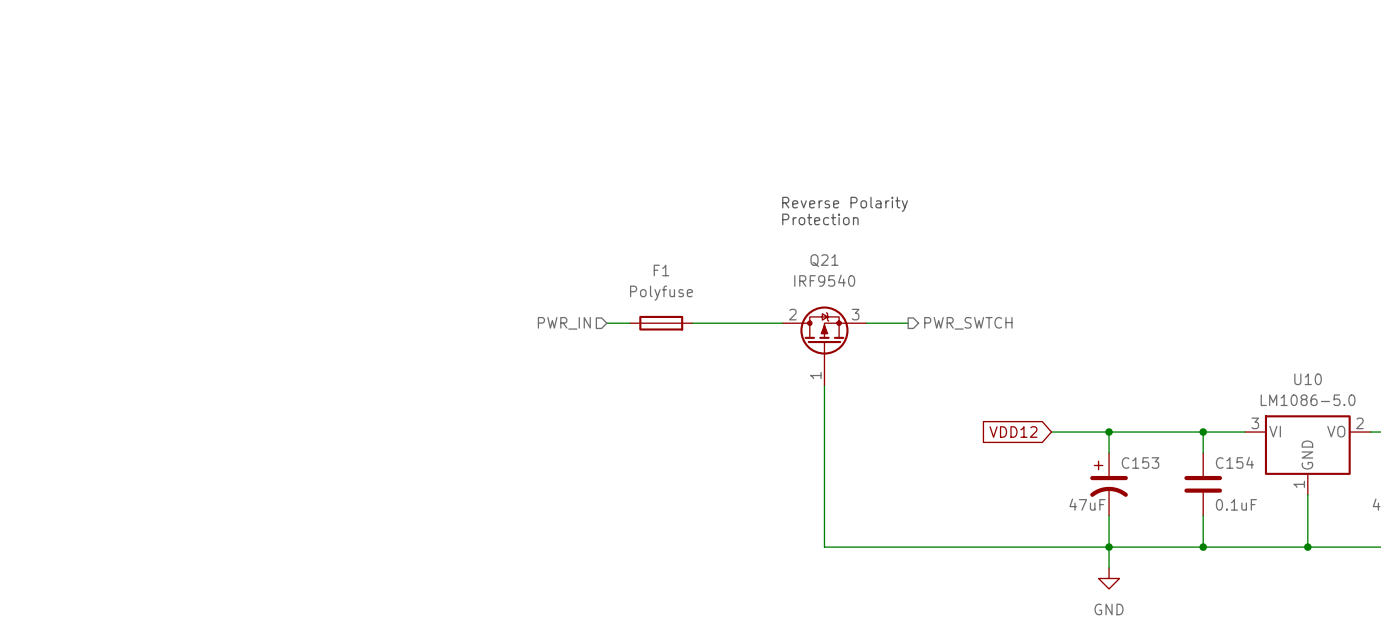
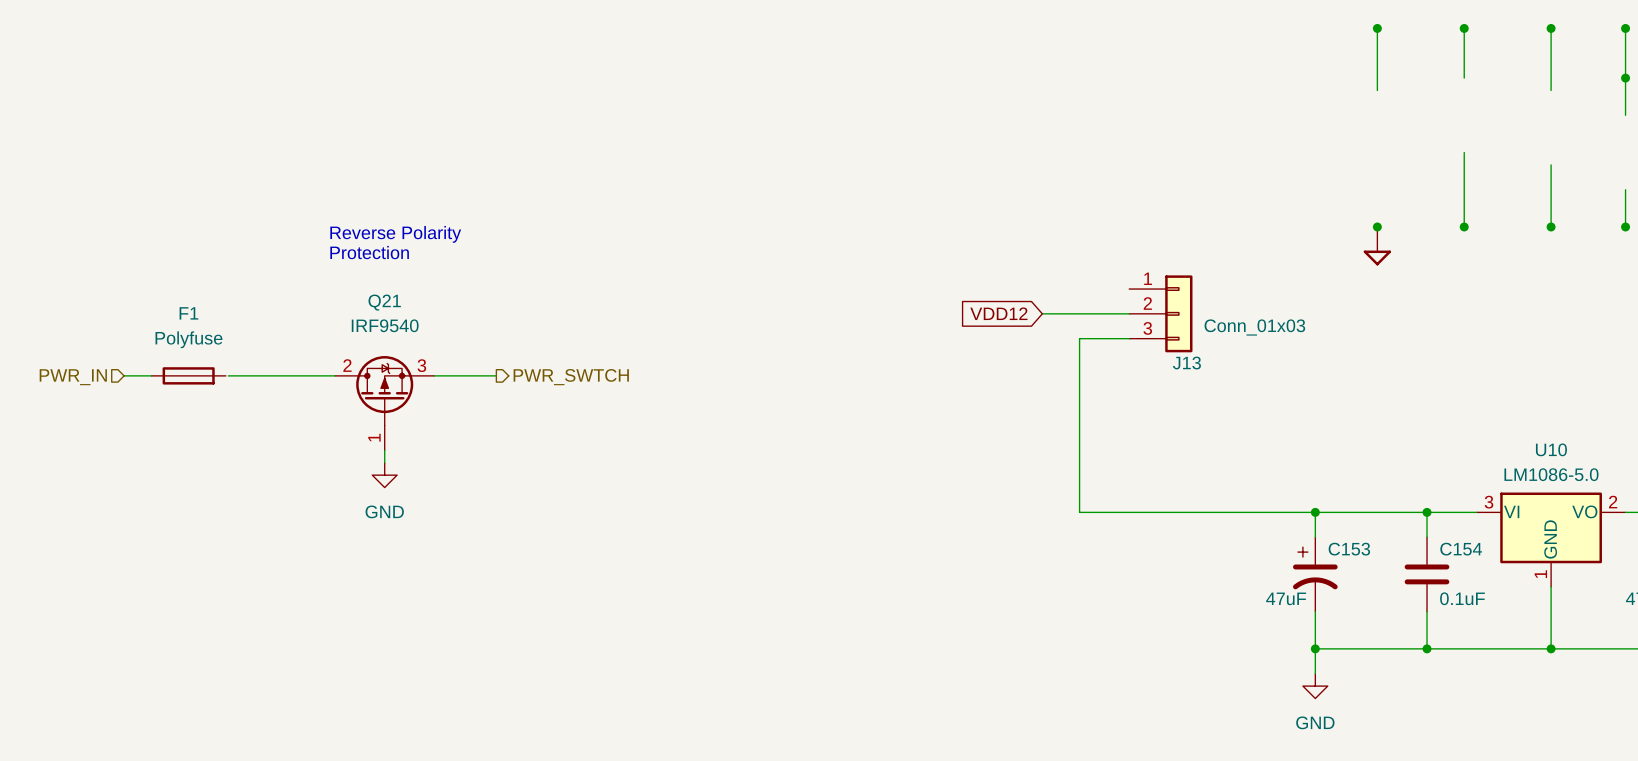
wire: none -> (1377, 28) (1377, 90)
junction: none -> (1377, 28)
wire: none -> (1464, 28) (1464, 78)
junction: none -> (1464, 28)
wire: none -> (1551, 28) (1551, 90)
junction: none -> (1551, 28)
wire: none -> (1625, 28) (1625, 115)
junction: none -> (1625, 28)
junction: none -> (1625, 78)
wire: none -> (1464, 152) (1464, 226)
wire: none -> (1551, 164) (1551, 226)
wire: none -> (1625, 189) (1625, 226)
junction: none -> (1377, 226)
junction: none -> (1464, 226)
junction: none -> (1551, 226)
junction: none -> (1625, 226)
text: none -> Reverse Polarity (395, 234)
text: Reverse Polarity (845, 204) -> none
power symbol: none -> (1377, 246)
text: none -> Protection (369, 252)
text: Protection (820, 219) -> none
global label: none -> VDD12 (998, 313)
wire: none -> (1042, 313) (1129, 313)
J13: none -> Conn_01x03 (1160, 313)
wire: none -> (1129, 338) (1079, 338) (1079, 512) (1247, 512)
wire: none -> (124, 375) (151, 375)
wire: none -> (228, 375) (335, 375)
wire: none -> (434, 375) (496, 375)
hierarchical label: none -> PWR_IN (73, 377)
hierarchical label: none -> PWR_SWTCH (571, 377)
hierarchical label: PWR_IN (564, 323) -> none
wire: (606, 323) (629, 323) -> none
F1 position: (661, 323) -> (188, 375)
wire: (692, 323) (782, 323) -> none
wire: (866, 323) (908, 323) -> none
hierarchical label: PWR_SWTCH (968, 323) -> none
Q21 position: (824, 346) -> (384, 403)
wire: none -> (384, 450) (384, 462)
wire: (824, 385) (824, 547) (1109, 547) -> none
power symbol: none -> GND (384, 475)
global label: VDD12 (1013, 432) -> none

